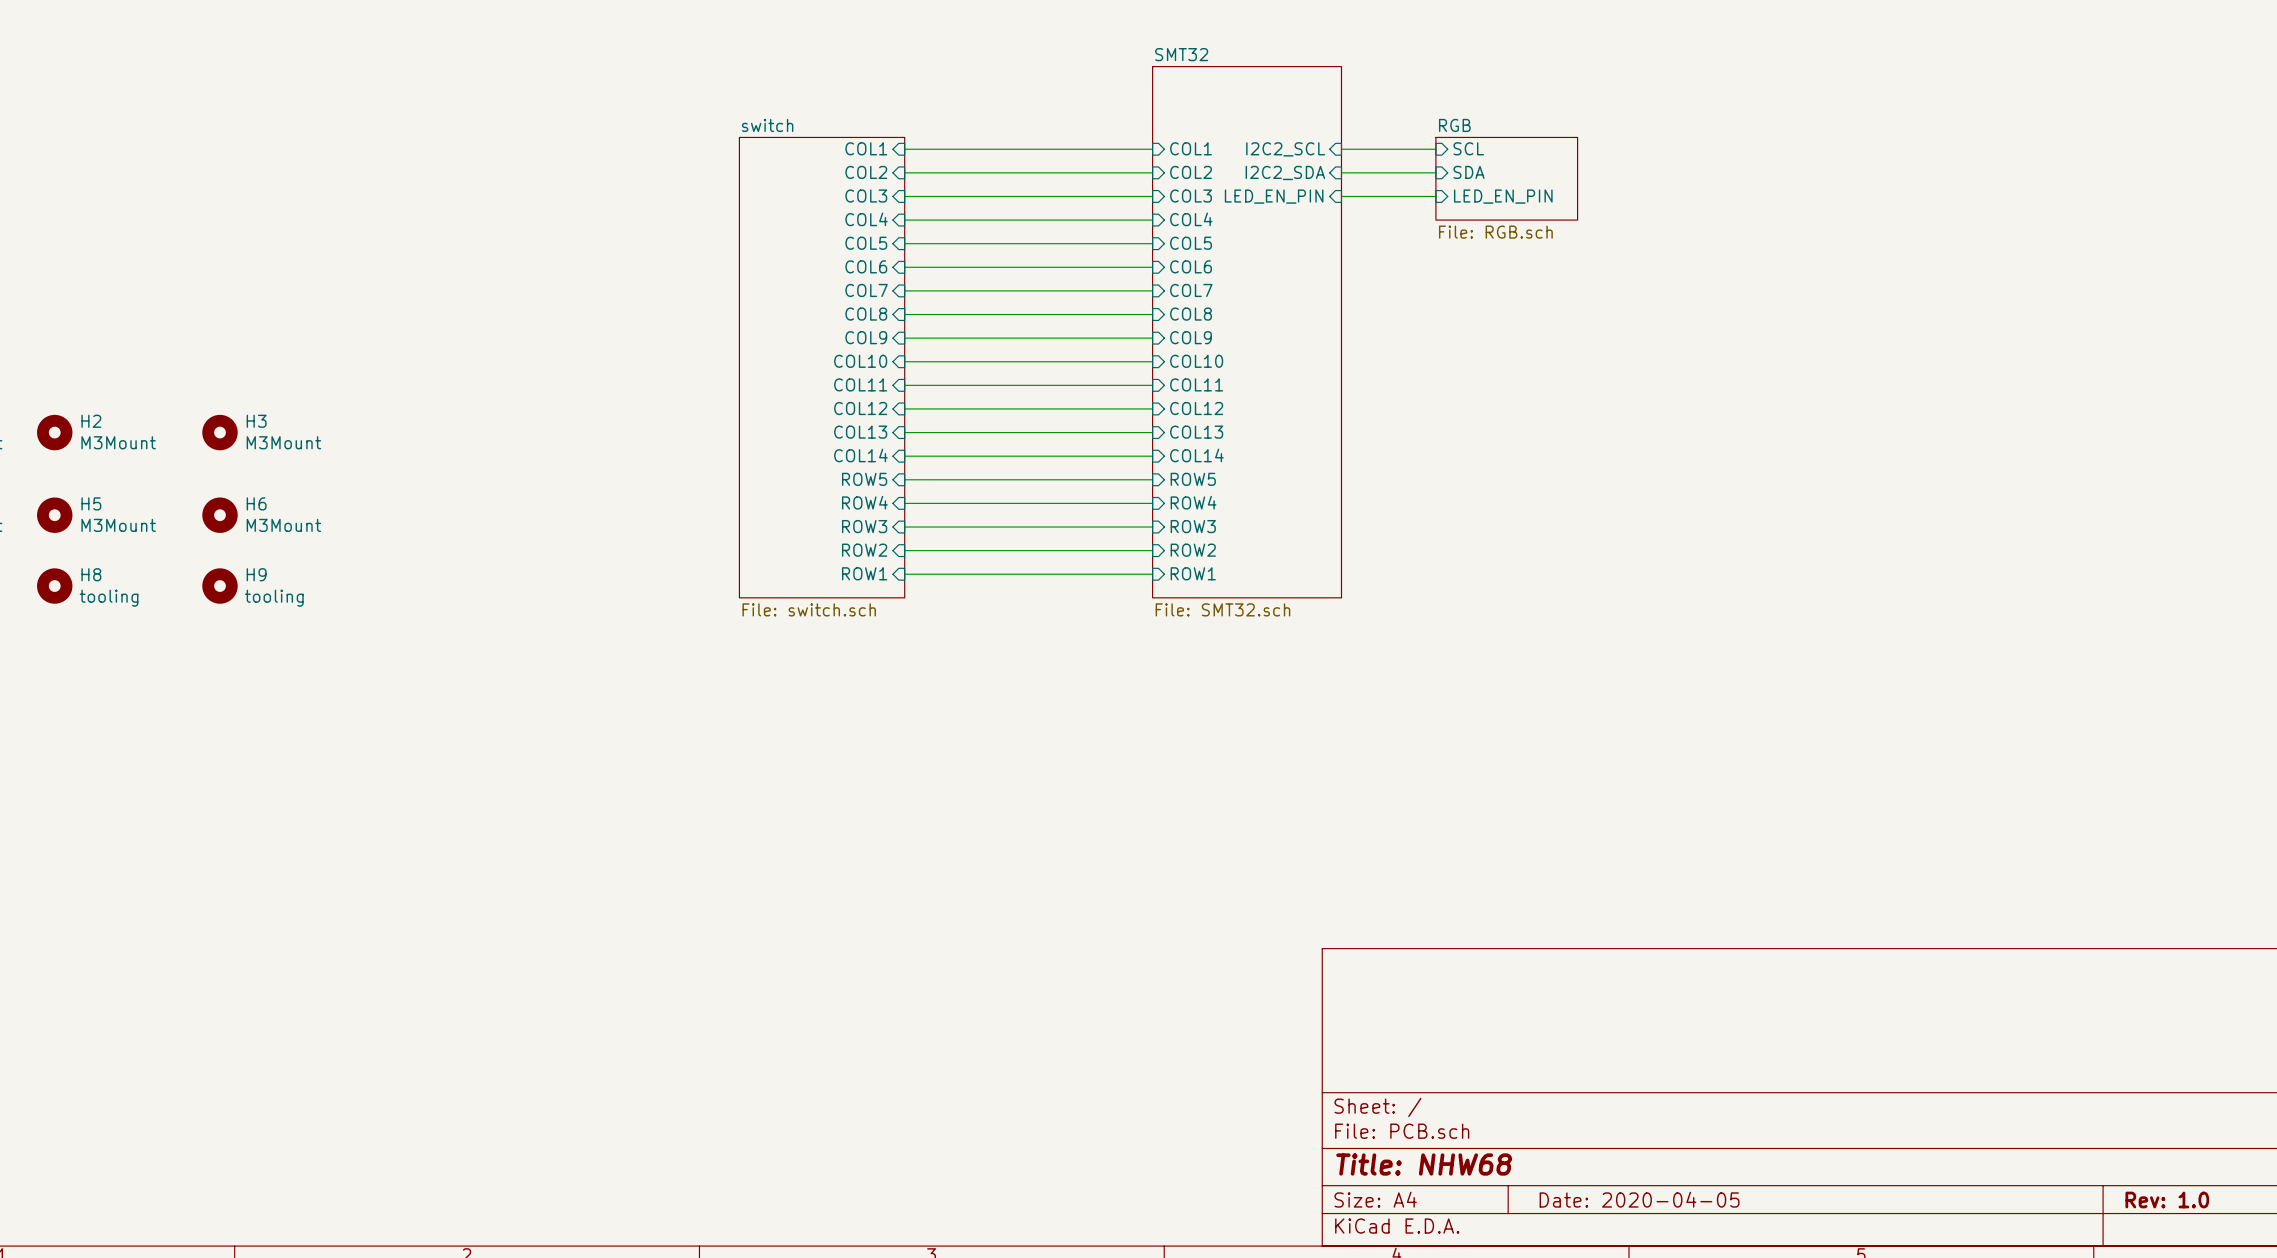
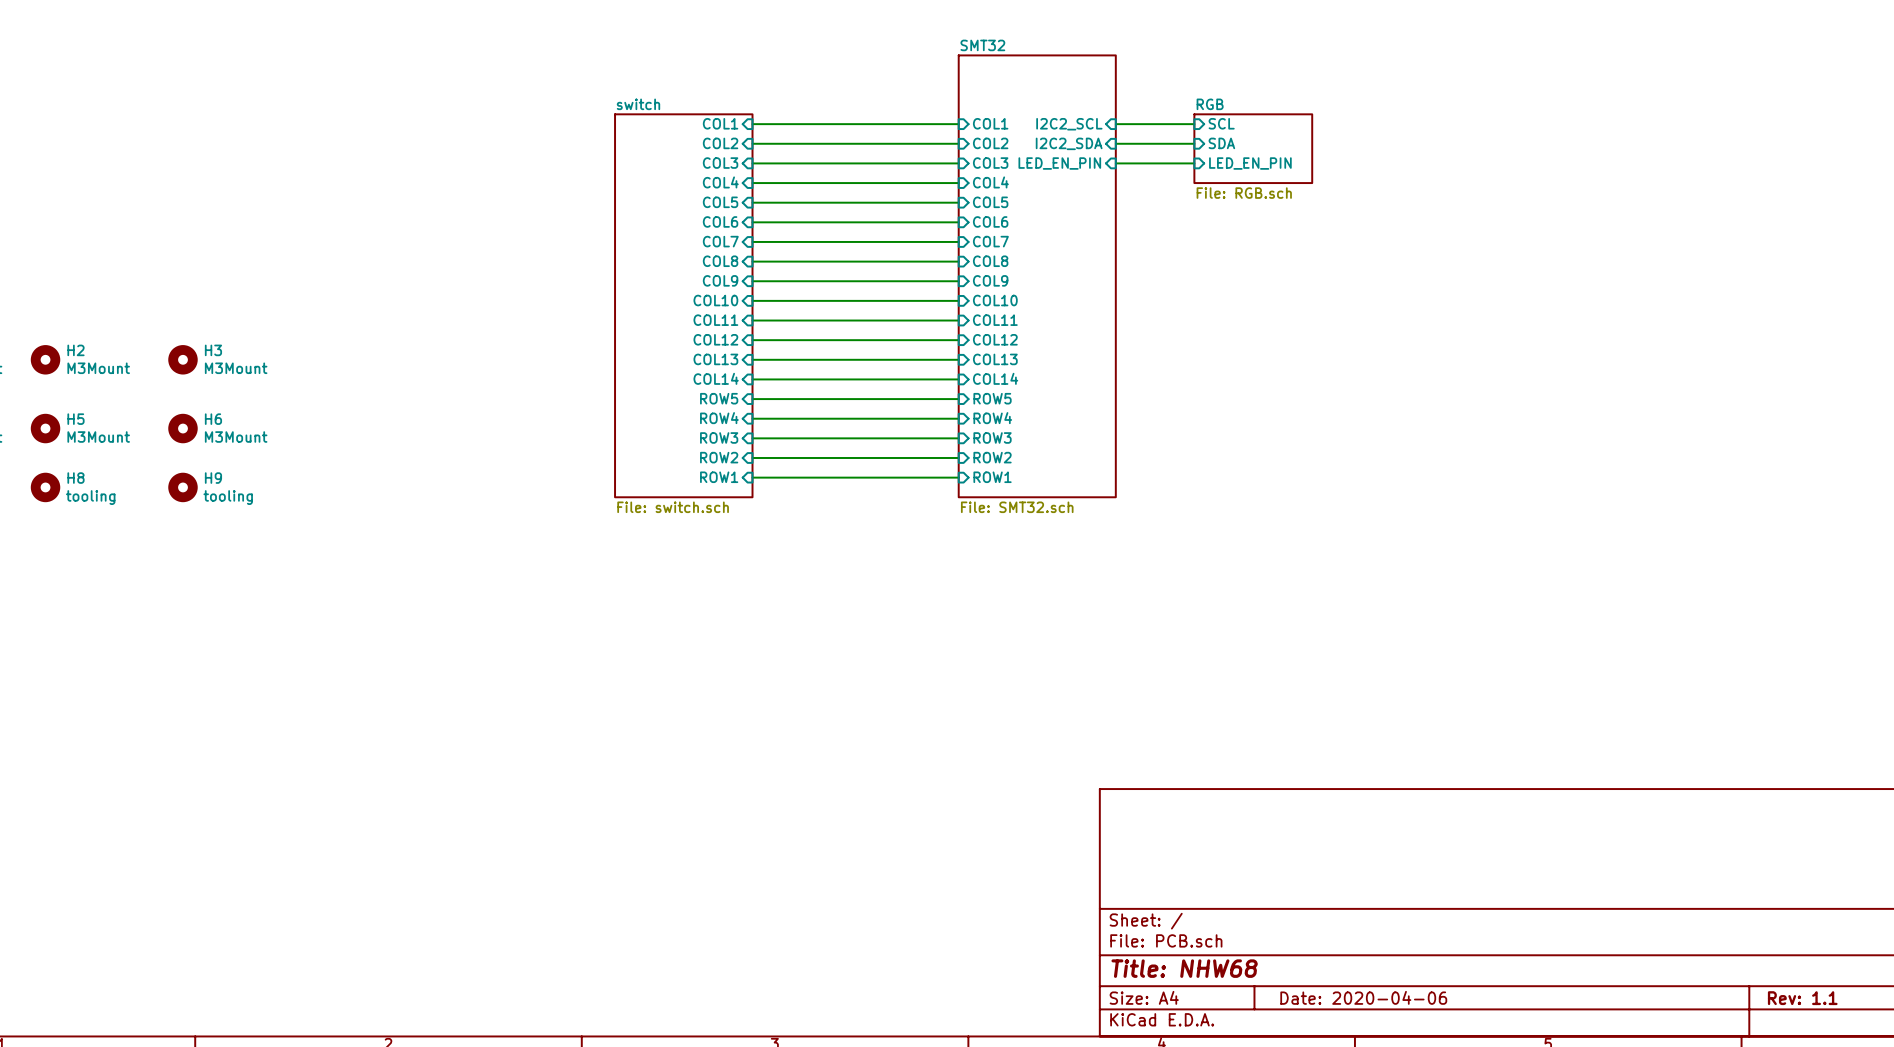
title block: Date: 2020-04-05 (1639, 1199) -> Date: 2020-04-06 (1363, 997)
title block: Rev: 1.0 (2167, 1200) -> Rev: 1.1 (1802, 998)

